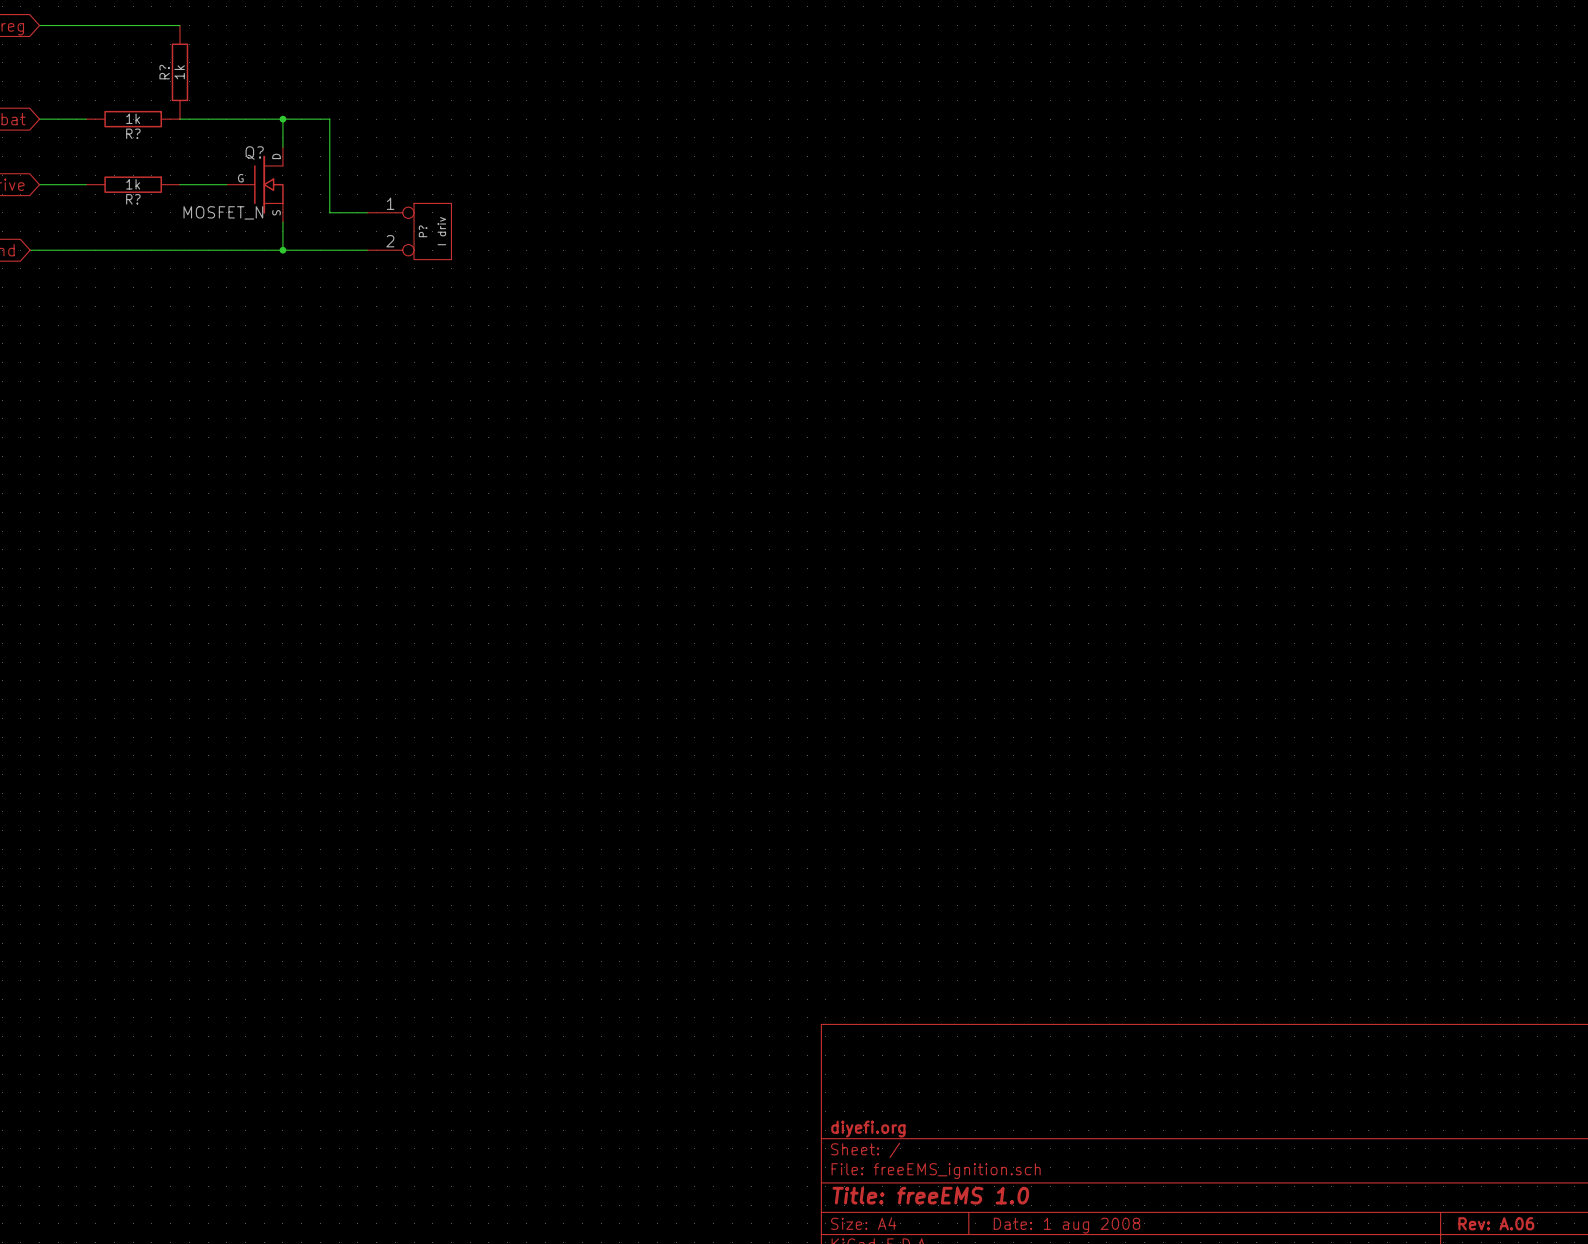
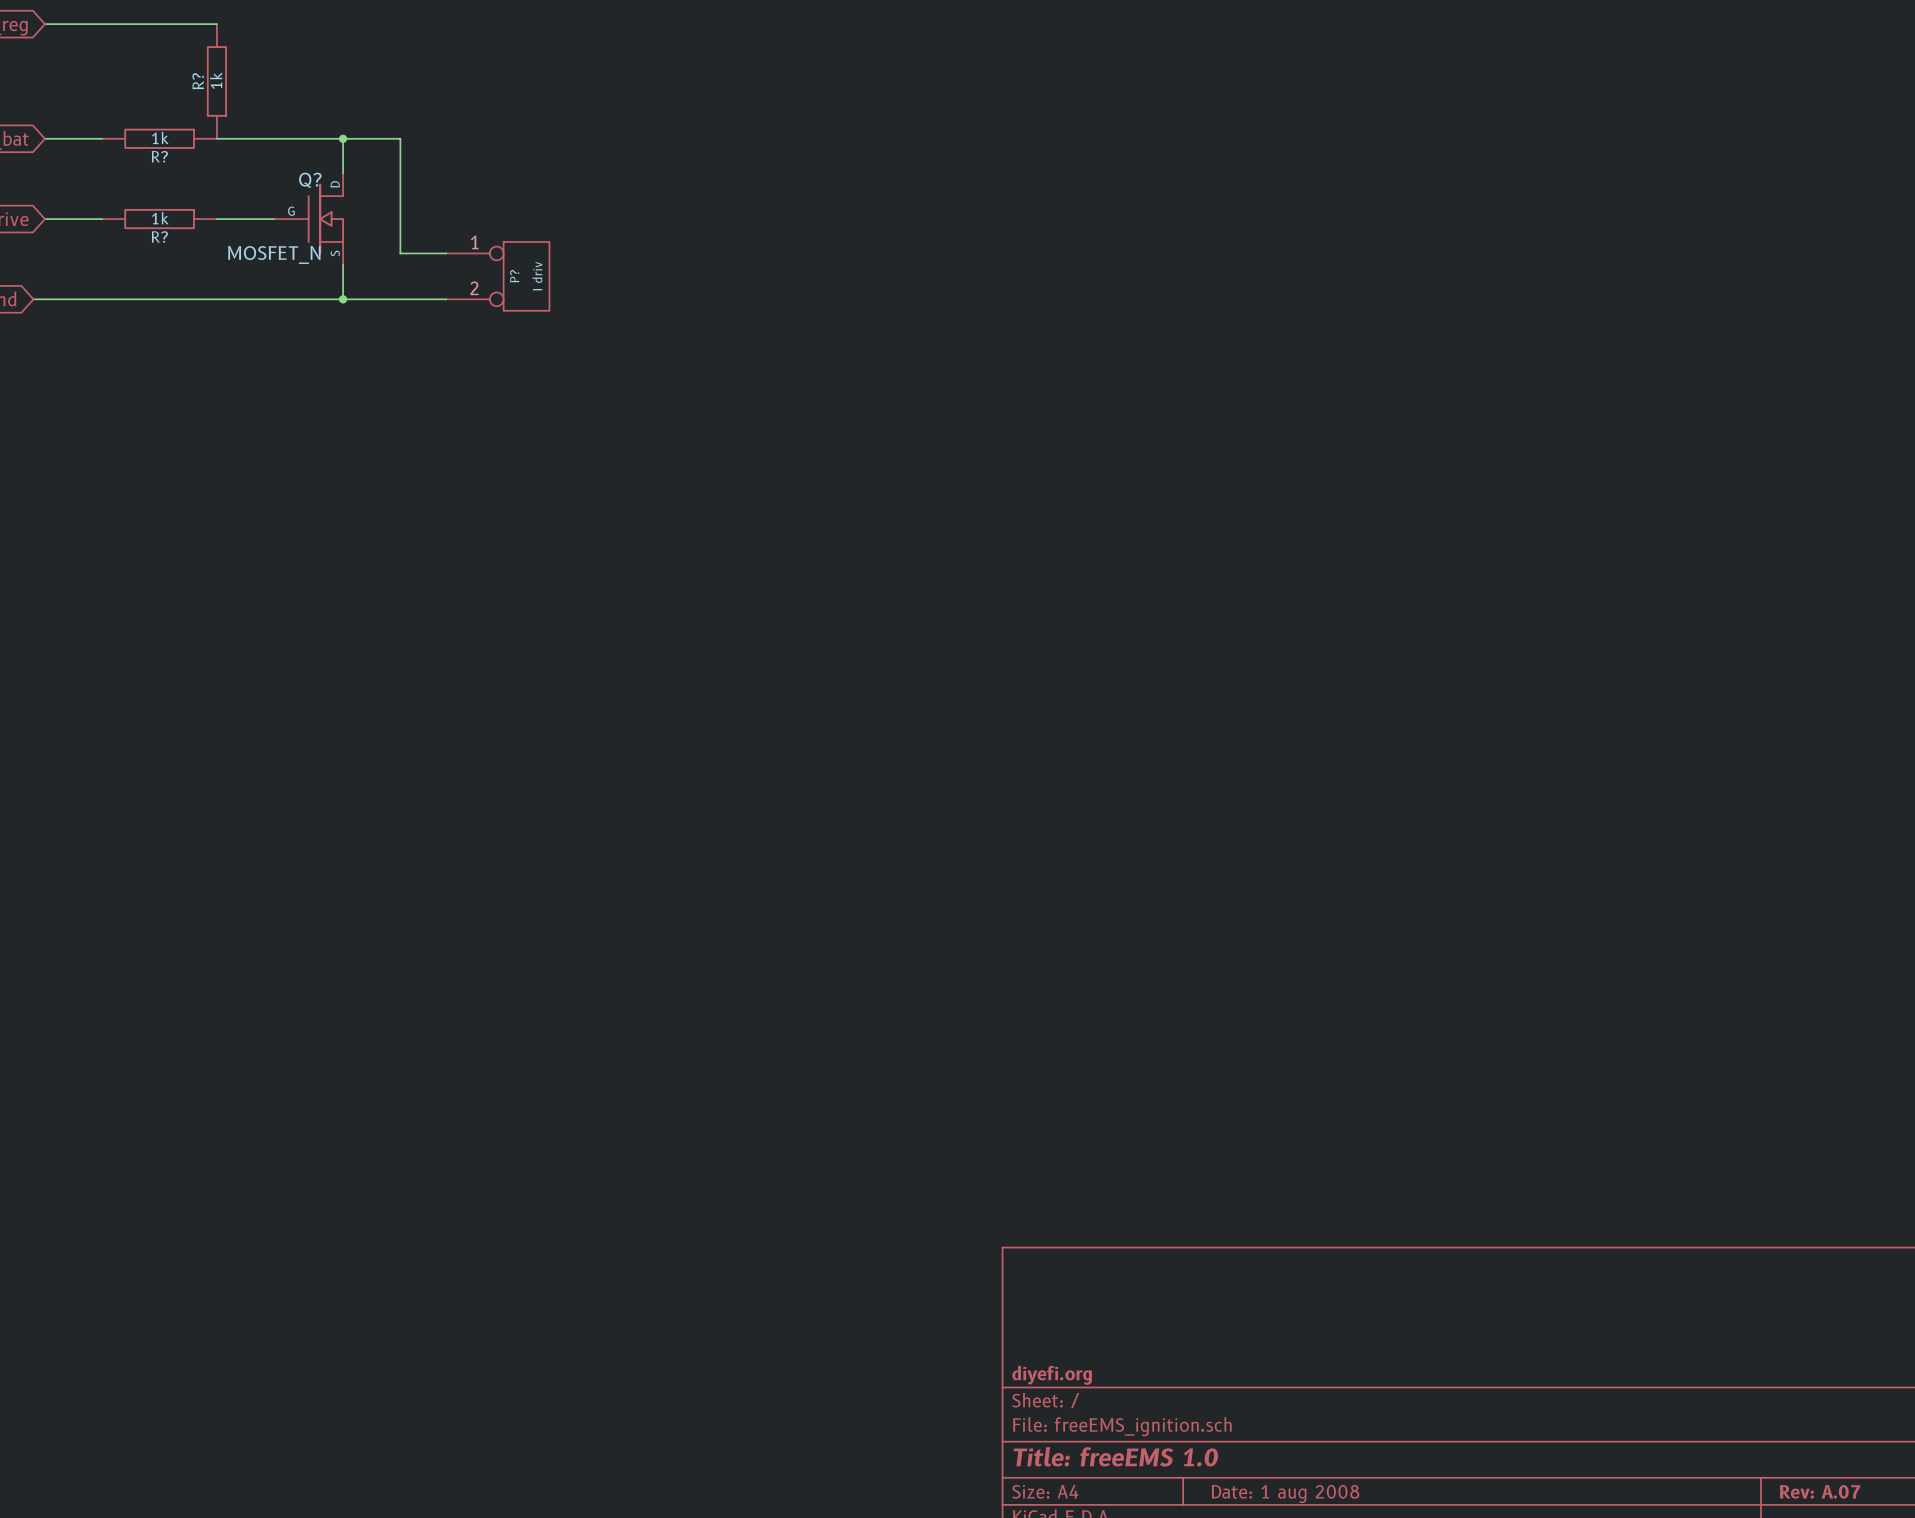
title block: Rev: A.06 (1496, 1223) -> Rev: A.07 (1819, 1491)

